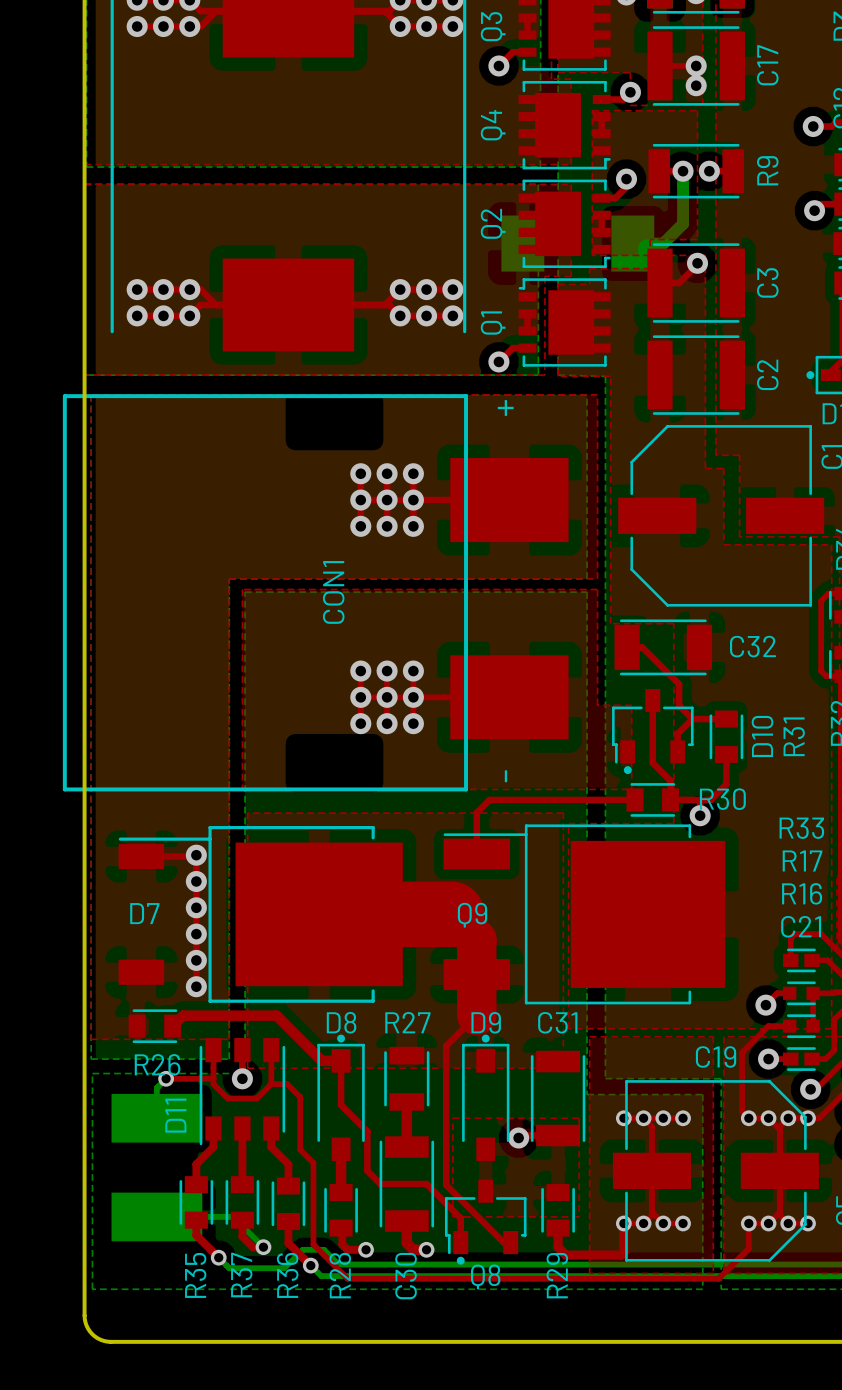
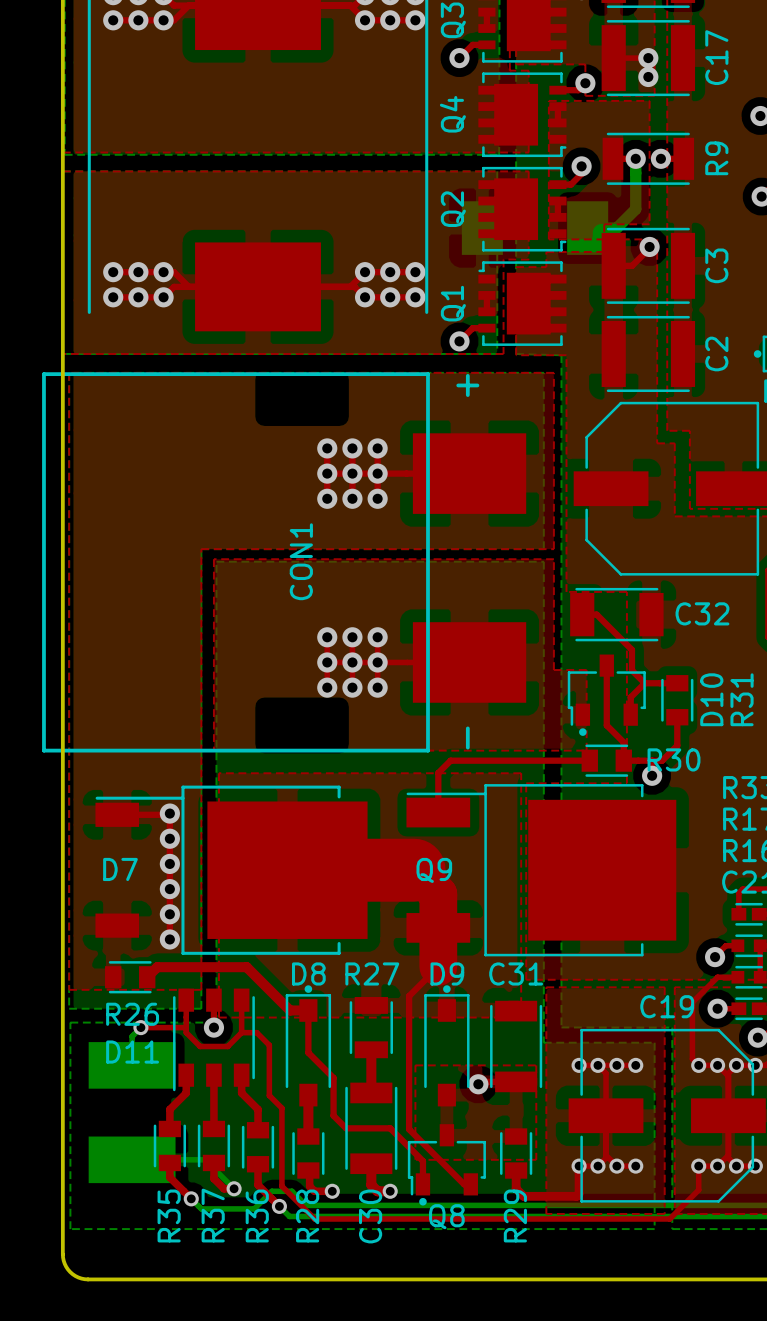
D11 name rotation: 0° (175, 1115) -> 90° clockwise (132, 1052)

